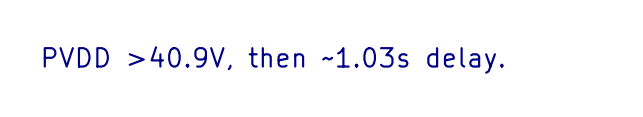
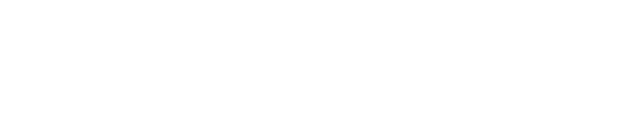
text: PVDD >40.9V, then ~1.03s delay. (273, 59) -> none

